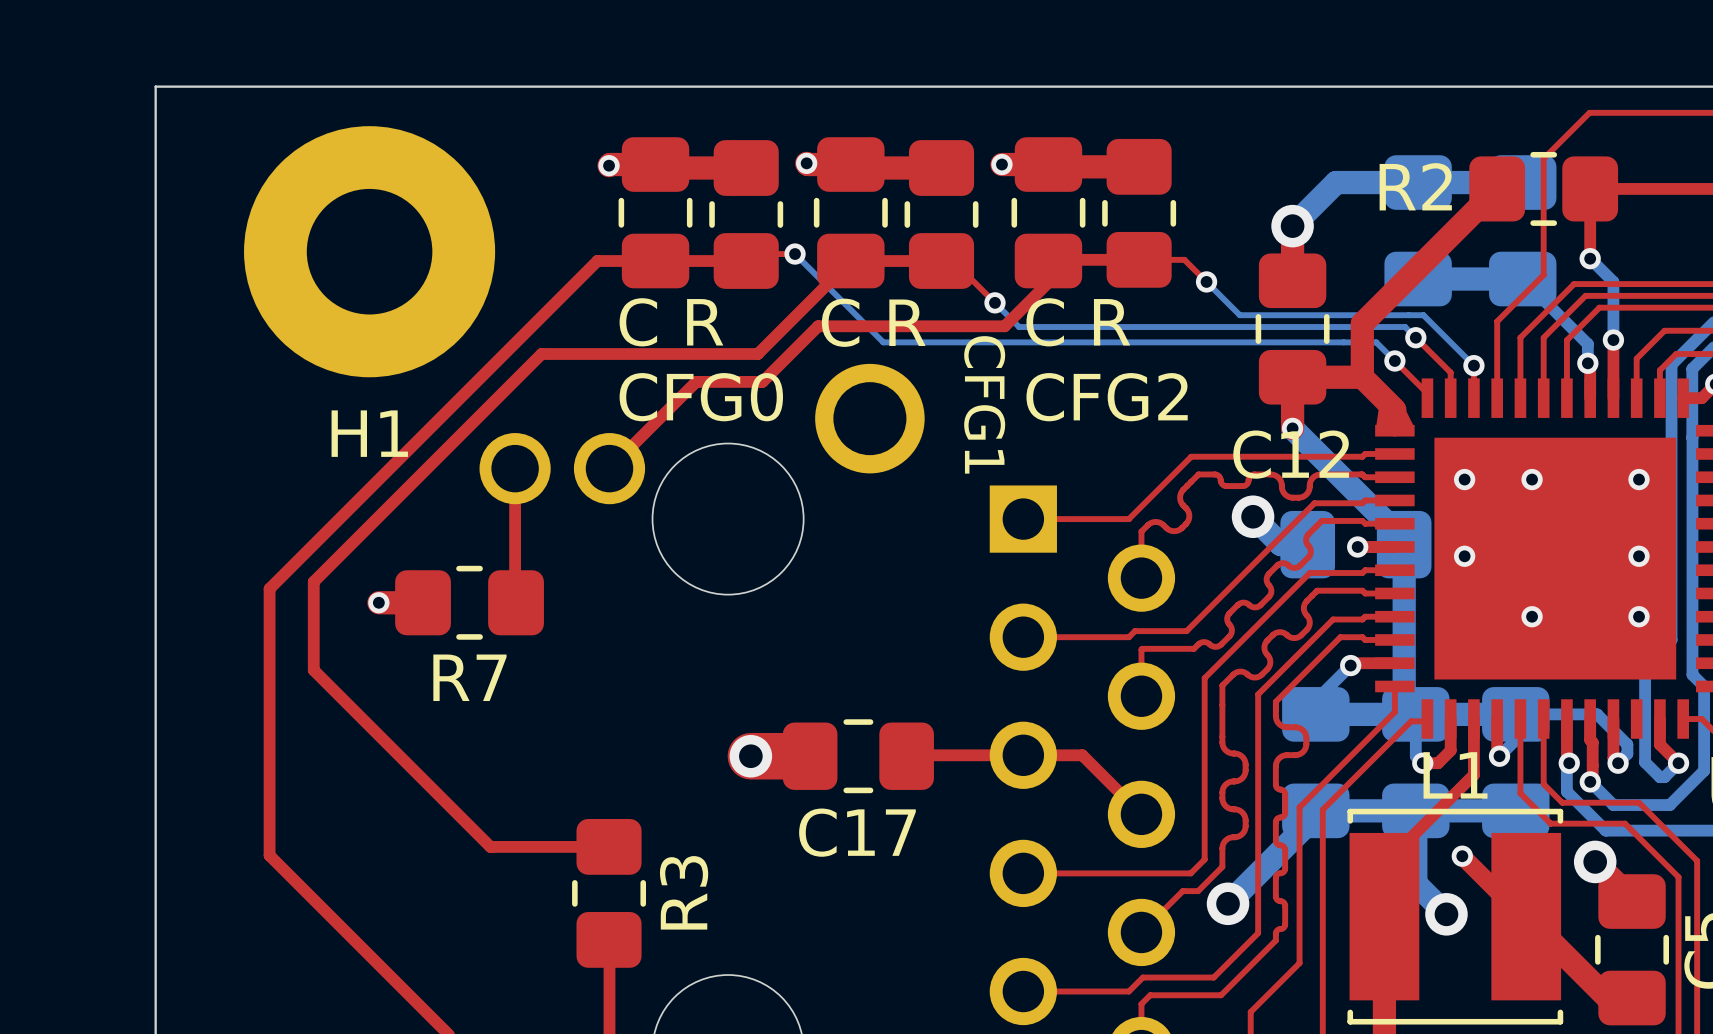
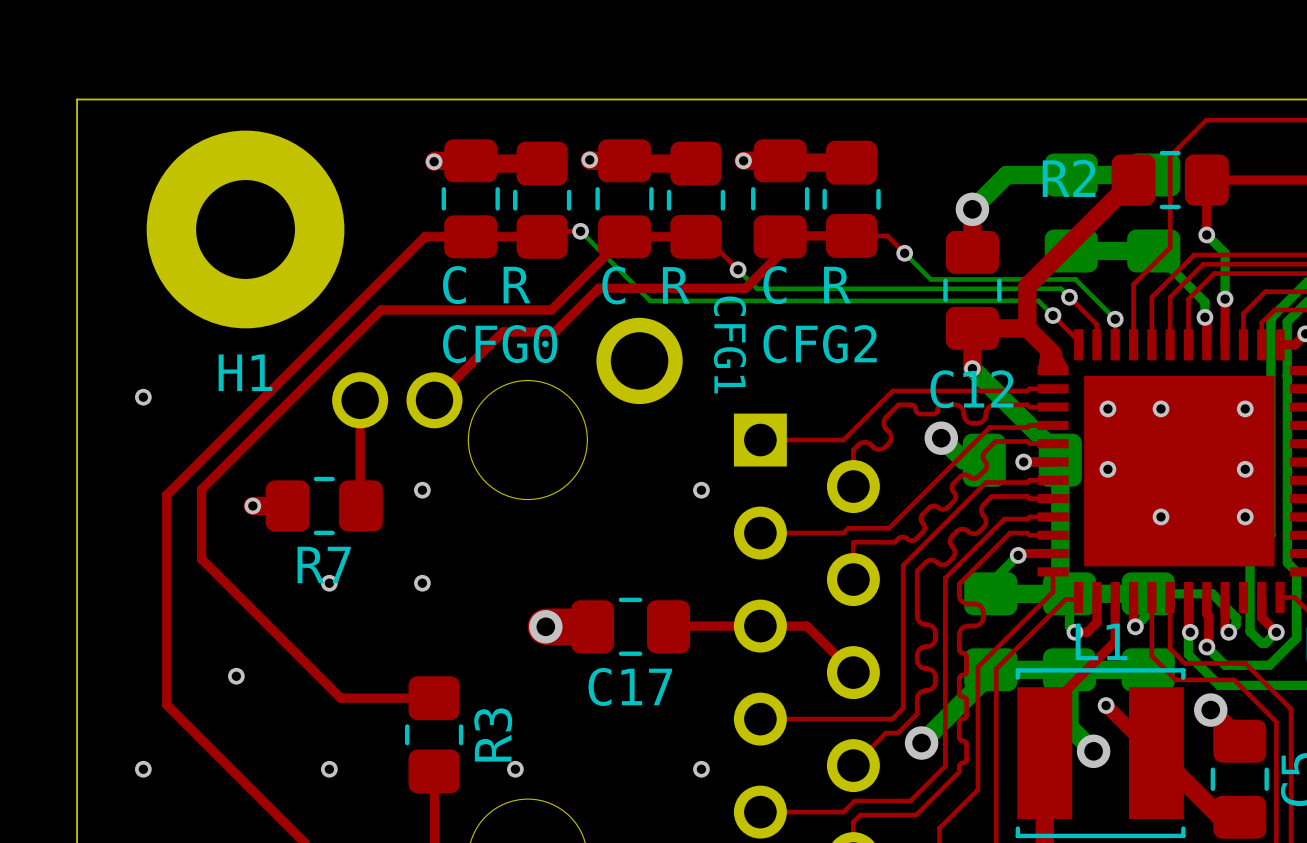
via: none -> (143, 397)
via: none -> (422, 490)
via: none -> (701, 490)
via: none -> (329, 583)
via: none -> (422, 583)
via: none -> (236, 676)
via: none -> (143, 769)
via: none -> (329, 769)
via: none -> (515, 769)
via: none -> (701, 769)

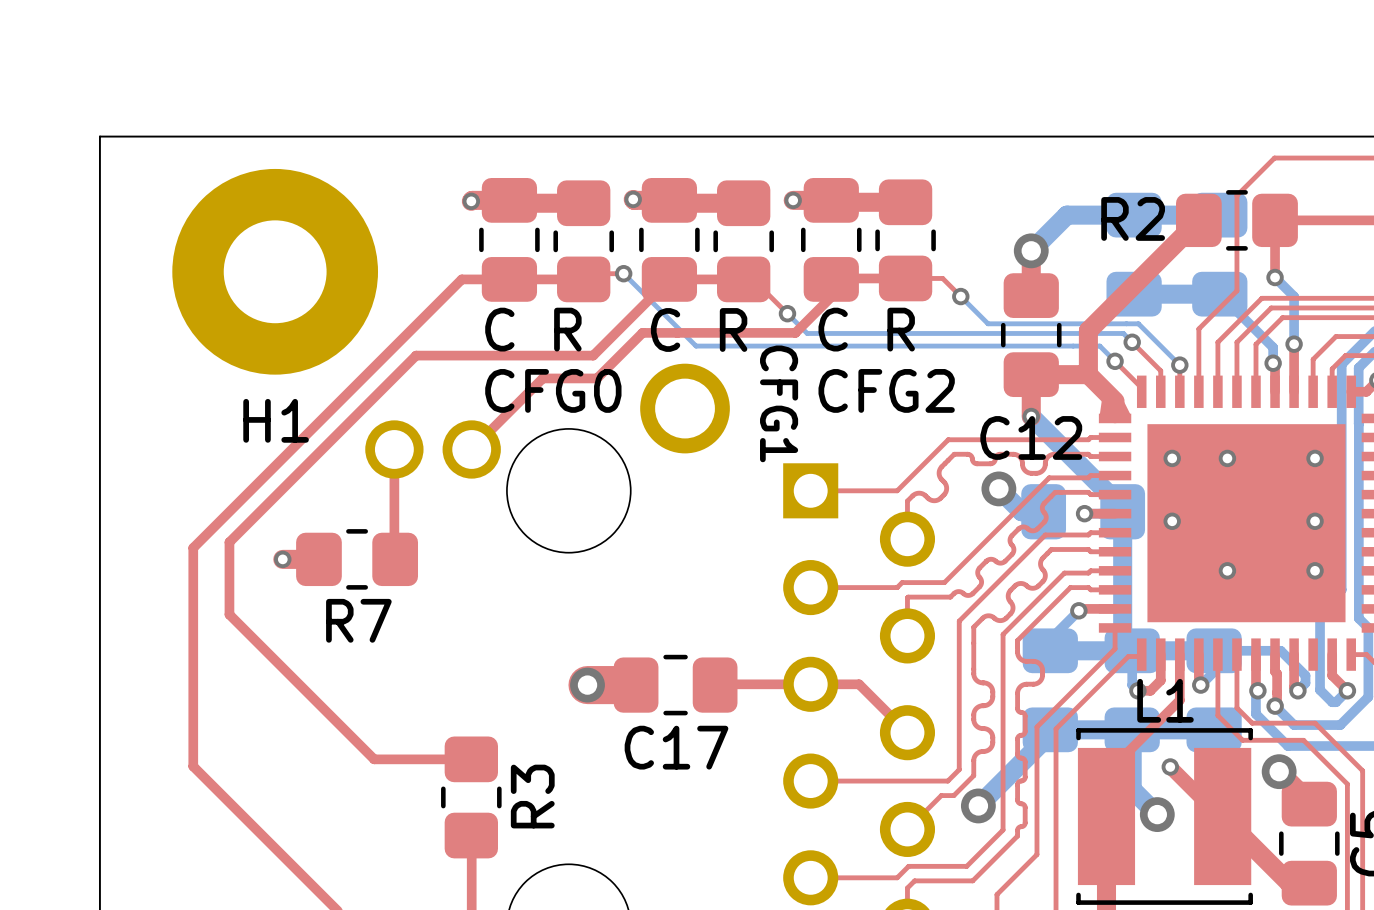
via: (143, 397) -> none
via: (422, 490) -> none
via: (701, 490) -> none
via: (329, 583) -> none
via: (422, 583) -> none
via: (236, 676) -> none
via: (143, 769) -> none
via: (329, 769) -> none
via: (515, 769) -> none
via: (701, 769) -> none

